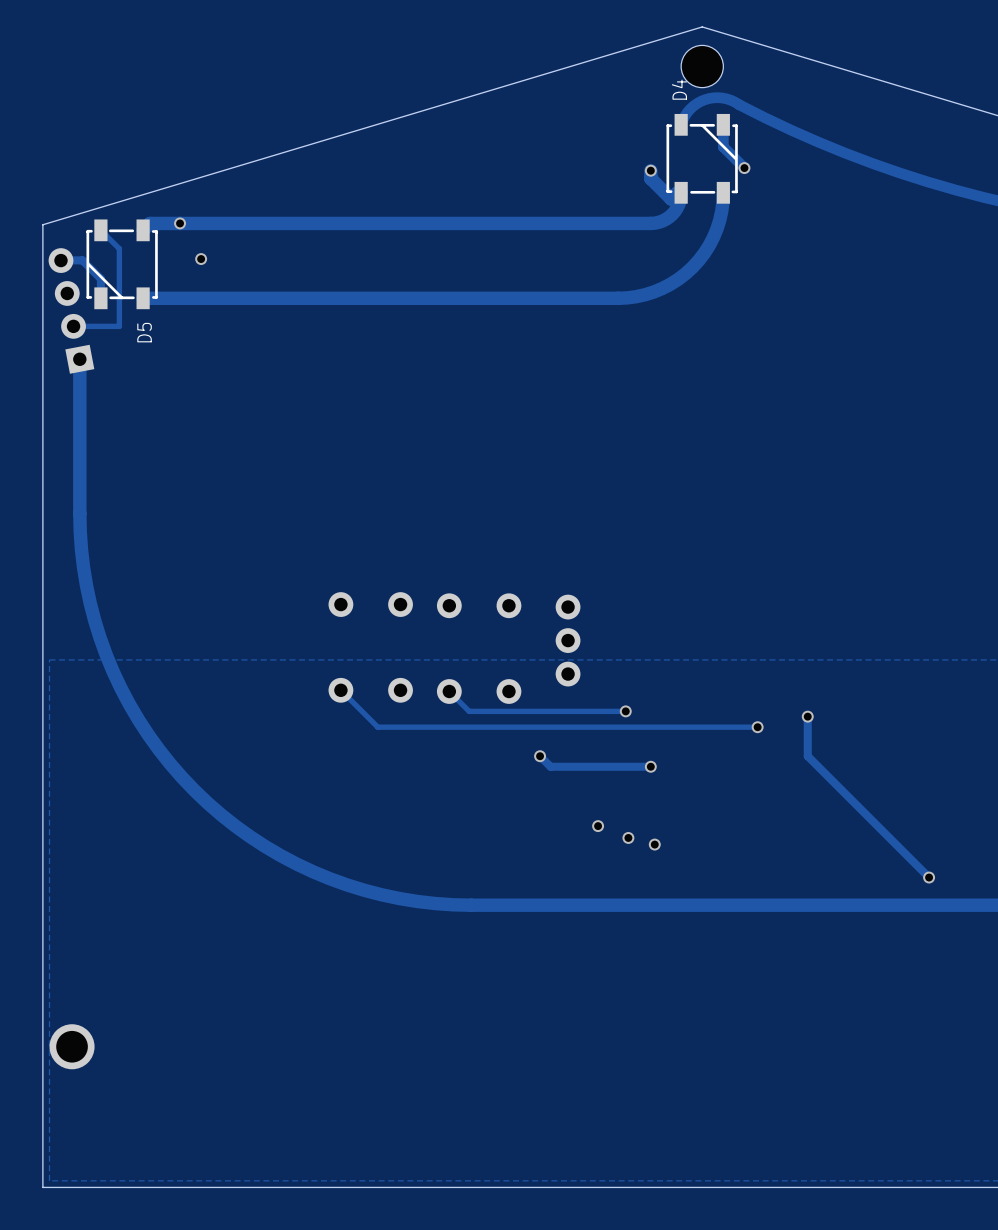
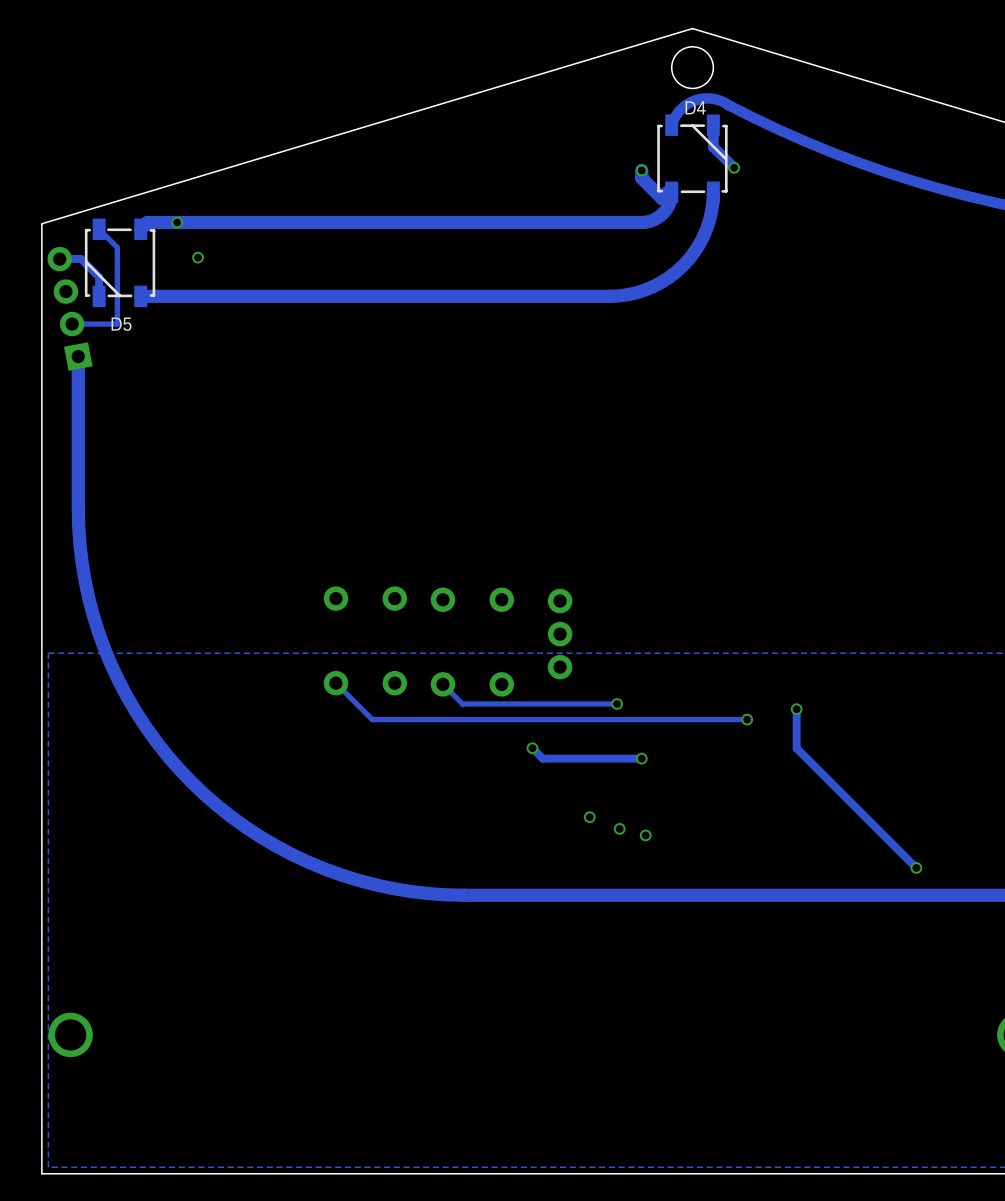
D4 name rotation: 0° (679, 89) -> 90° clockwise (695, 107)
D4 name position: D4 (679, 89) -> D4 (695, 107)
D5 name rotation: 0° (144, 332) -> 90° clockwise (121, 324)

